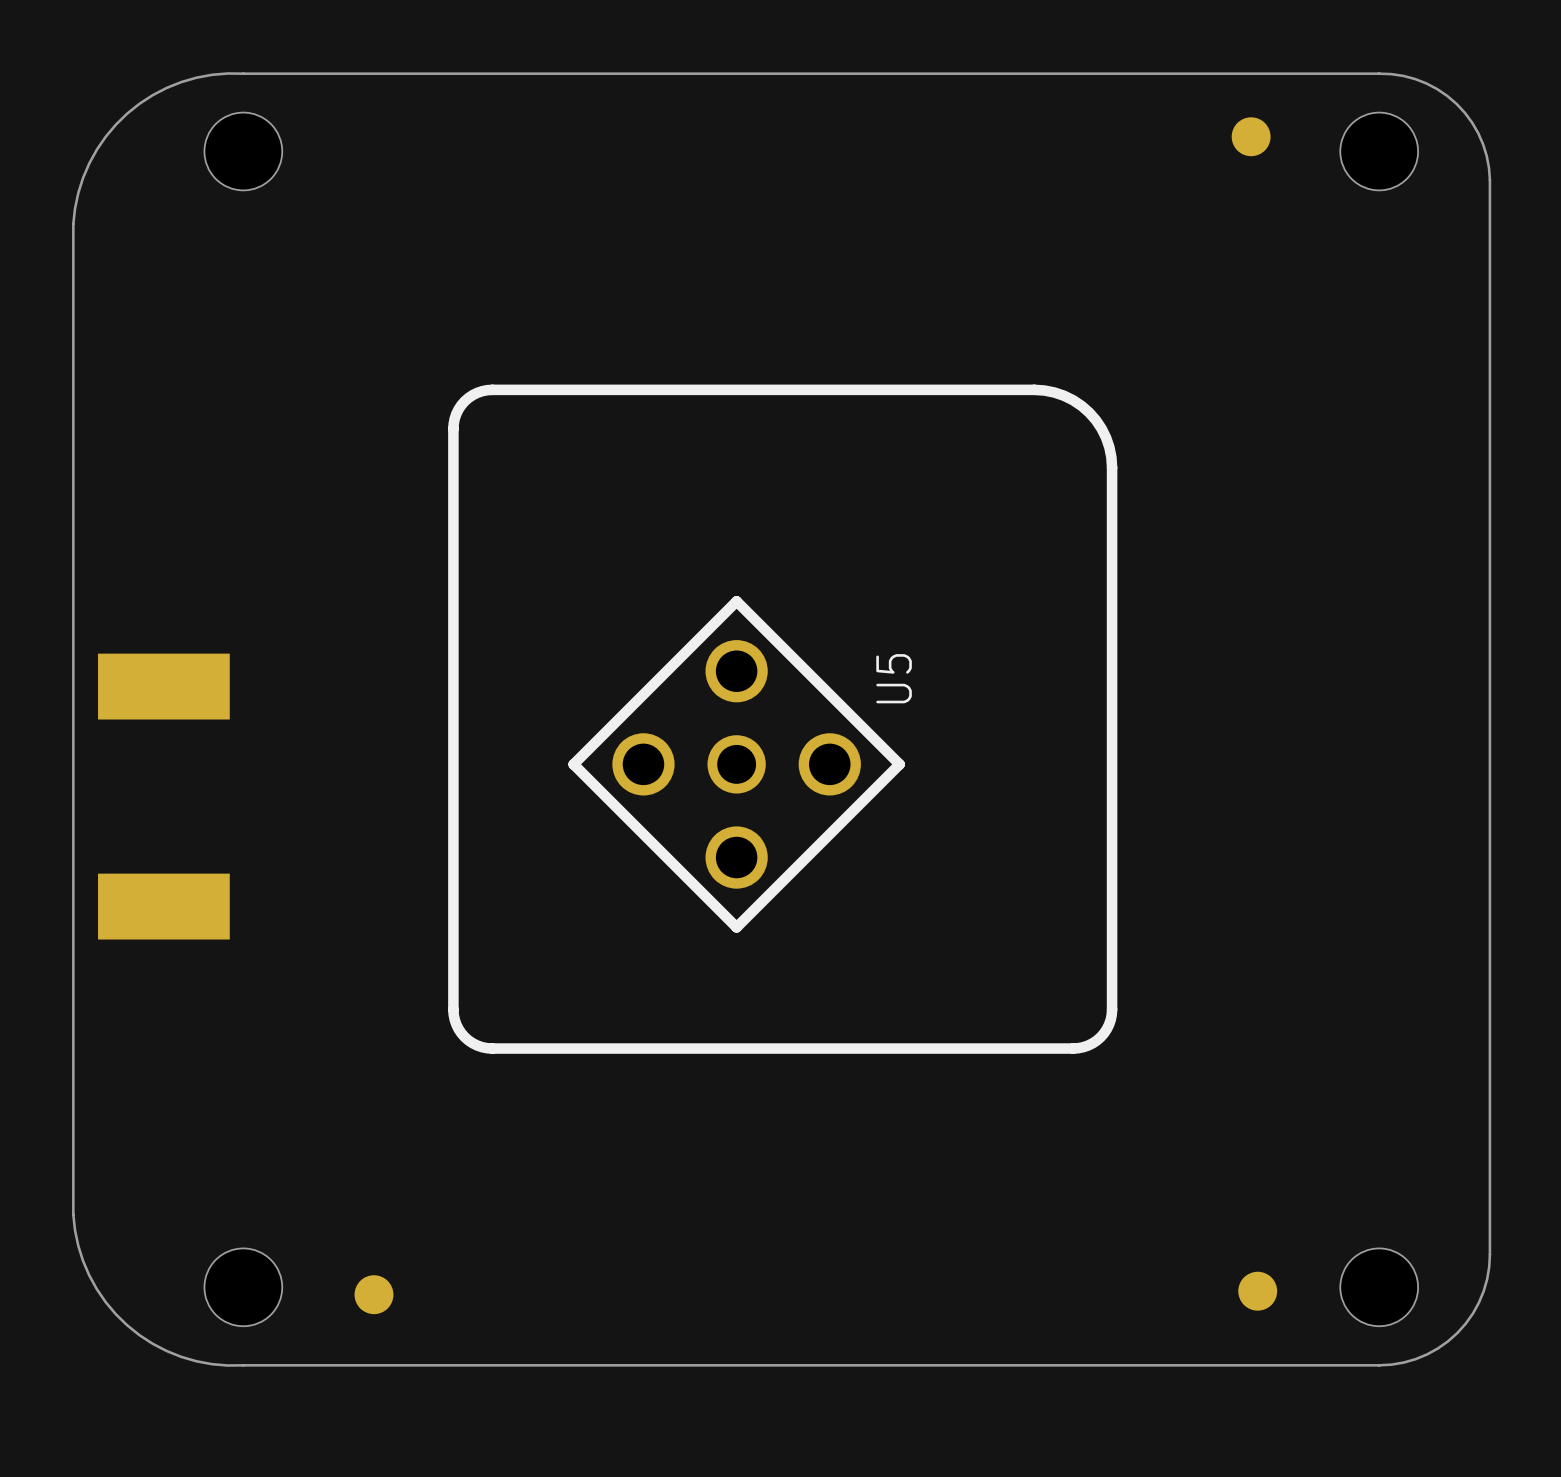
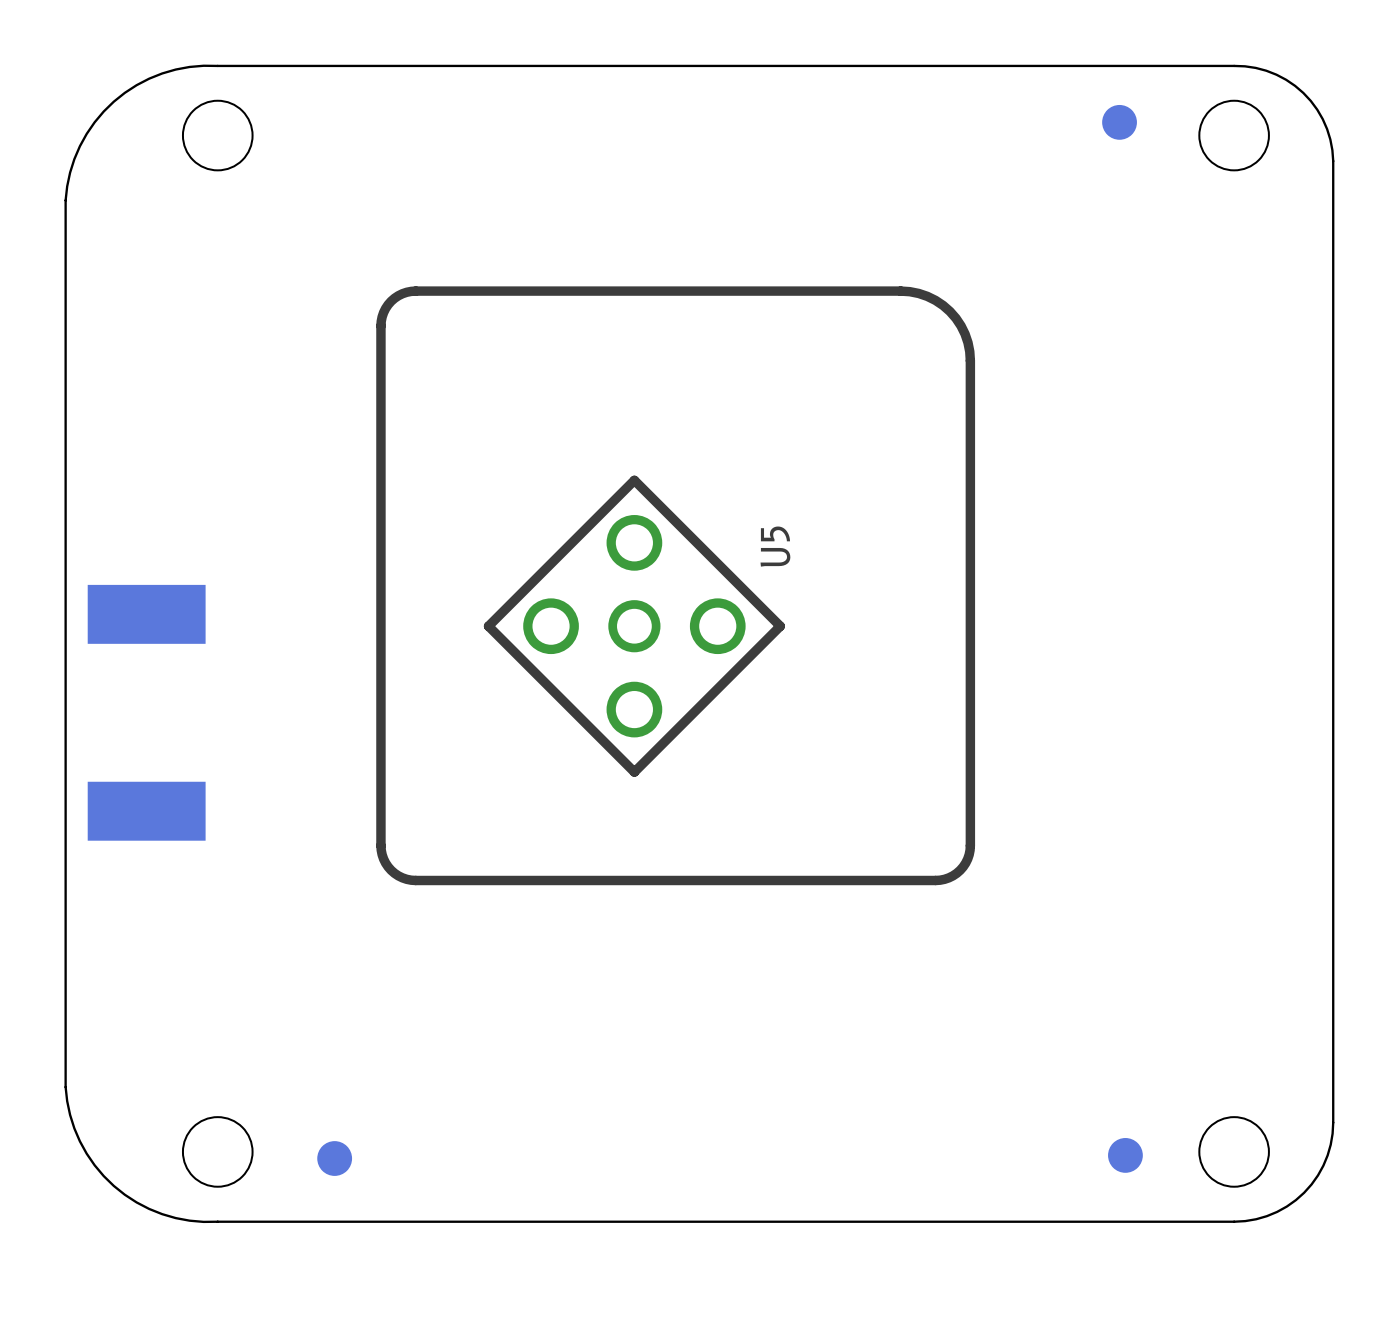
U5 position: (782, 719) -> (675, 585)

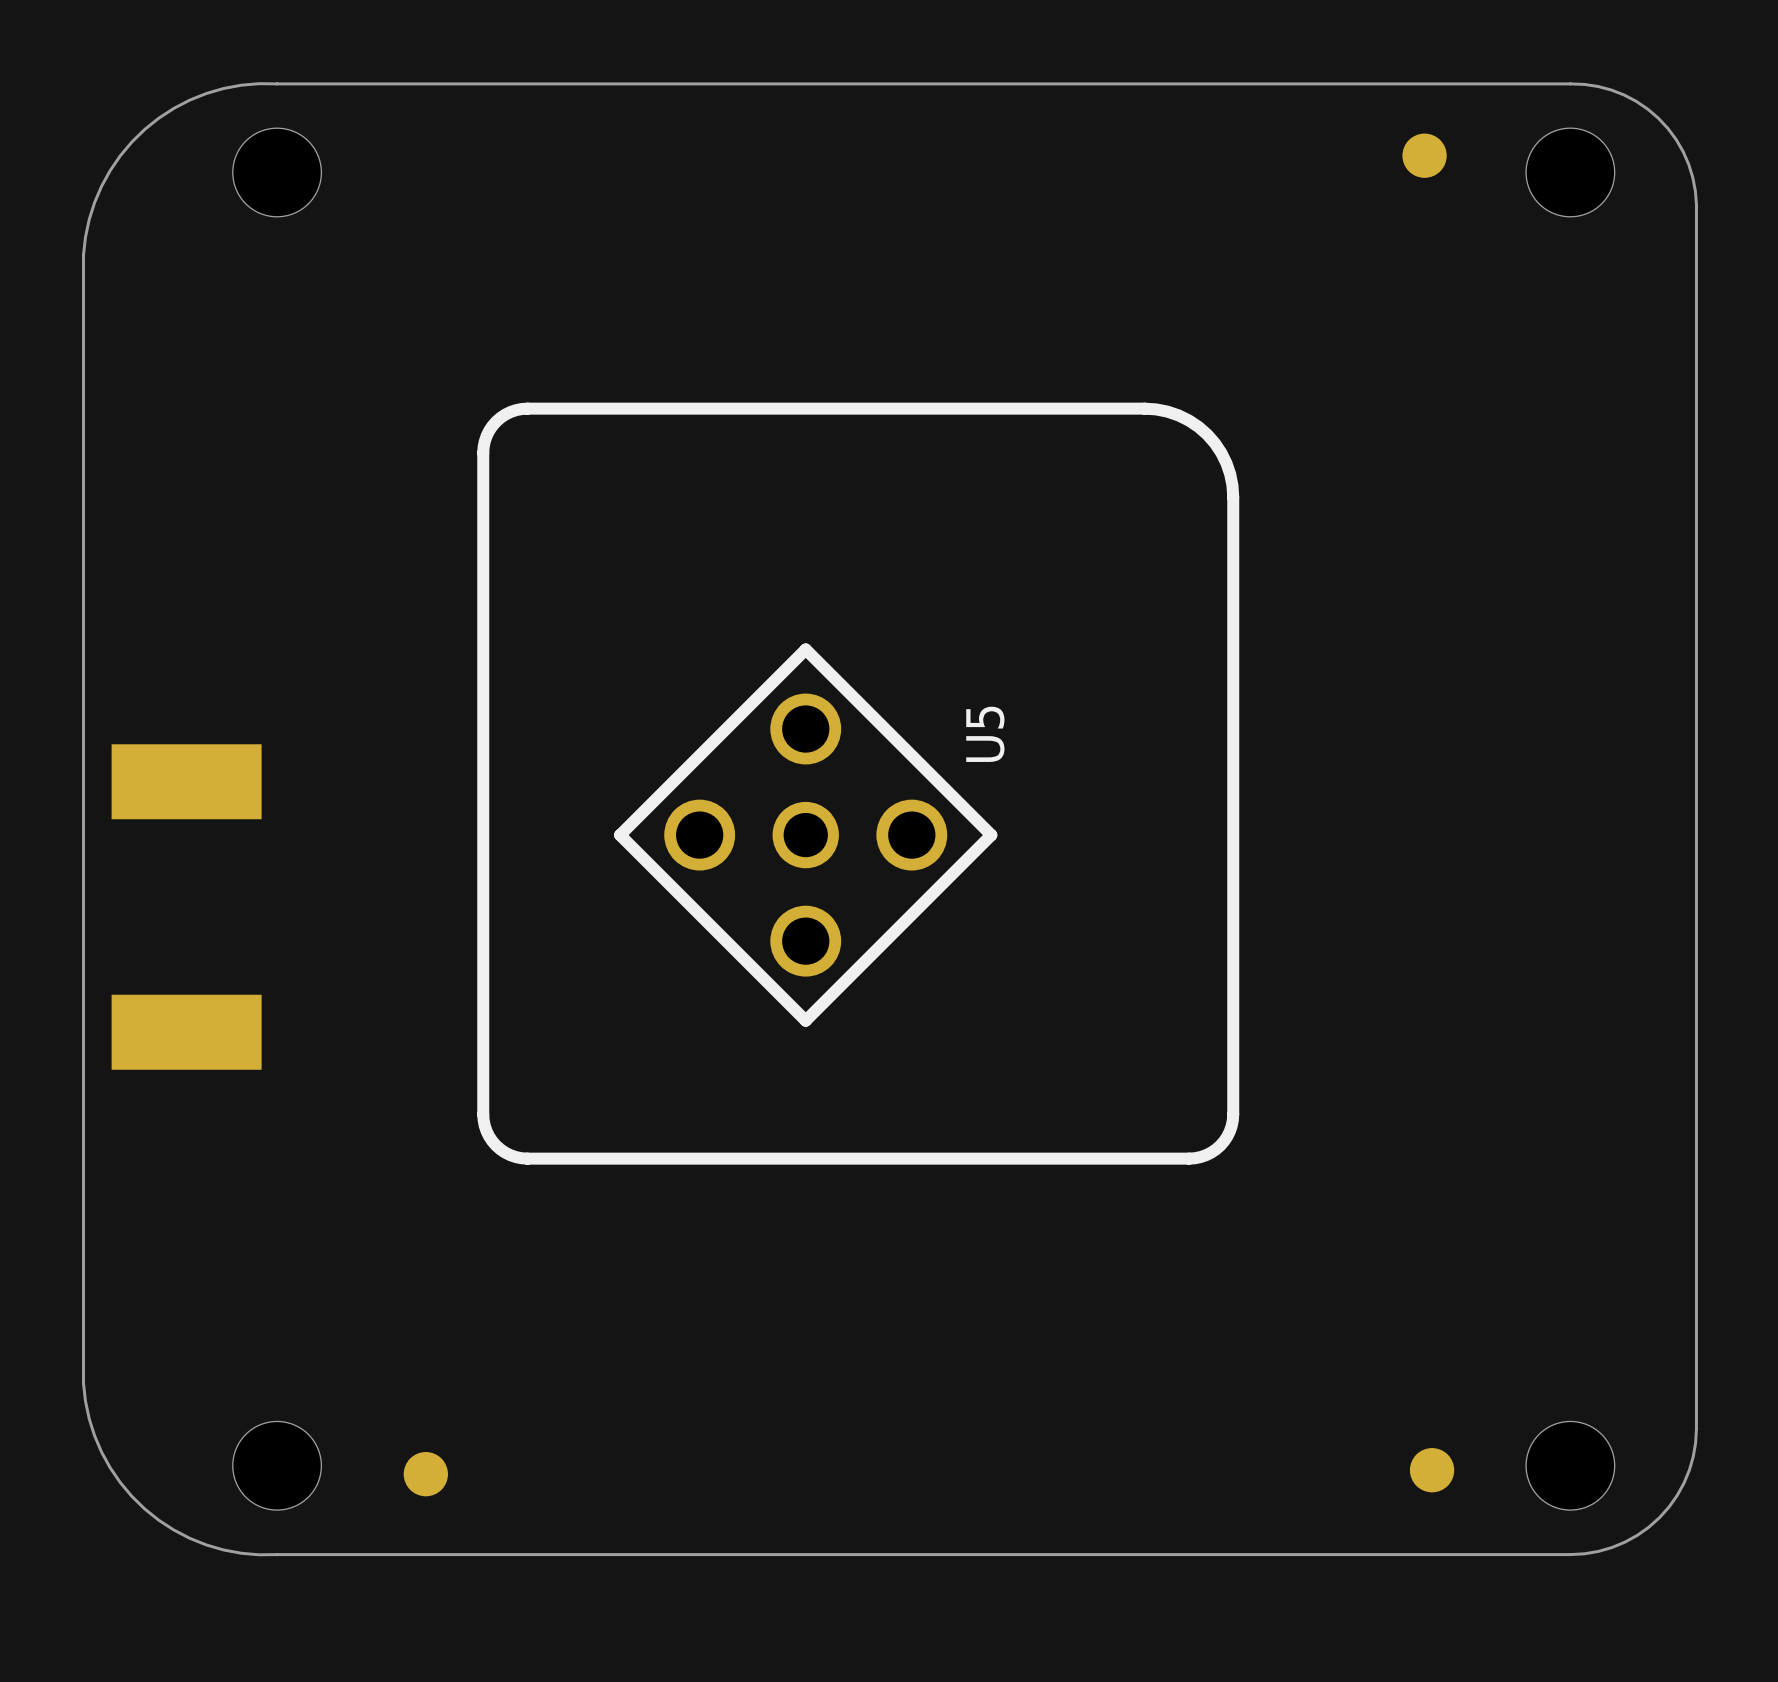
U5 position: (675, 585) -> (858, 783)

